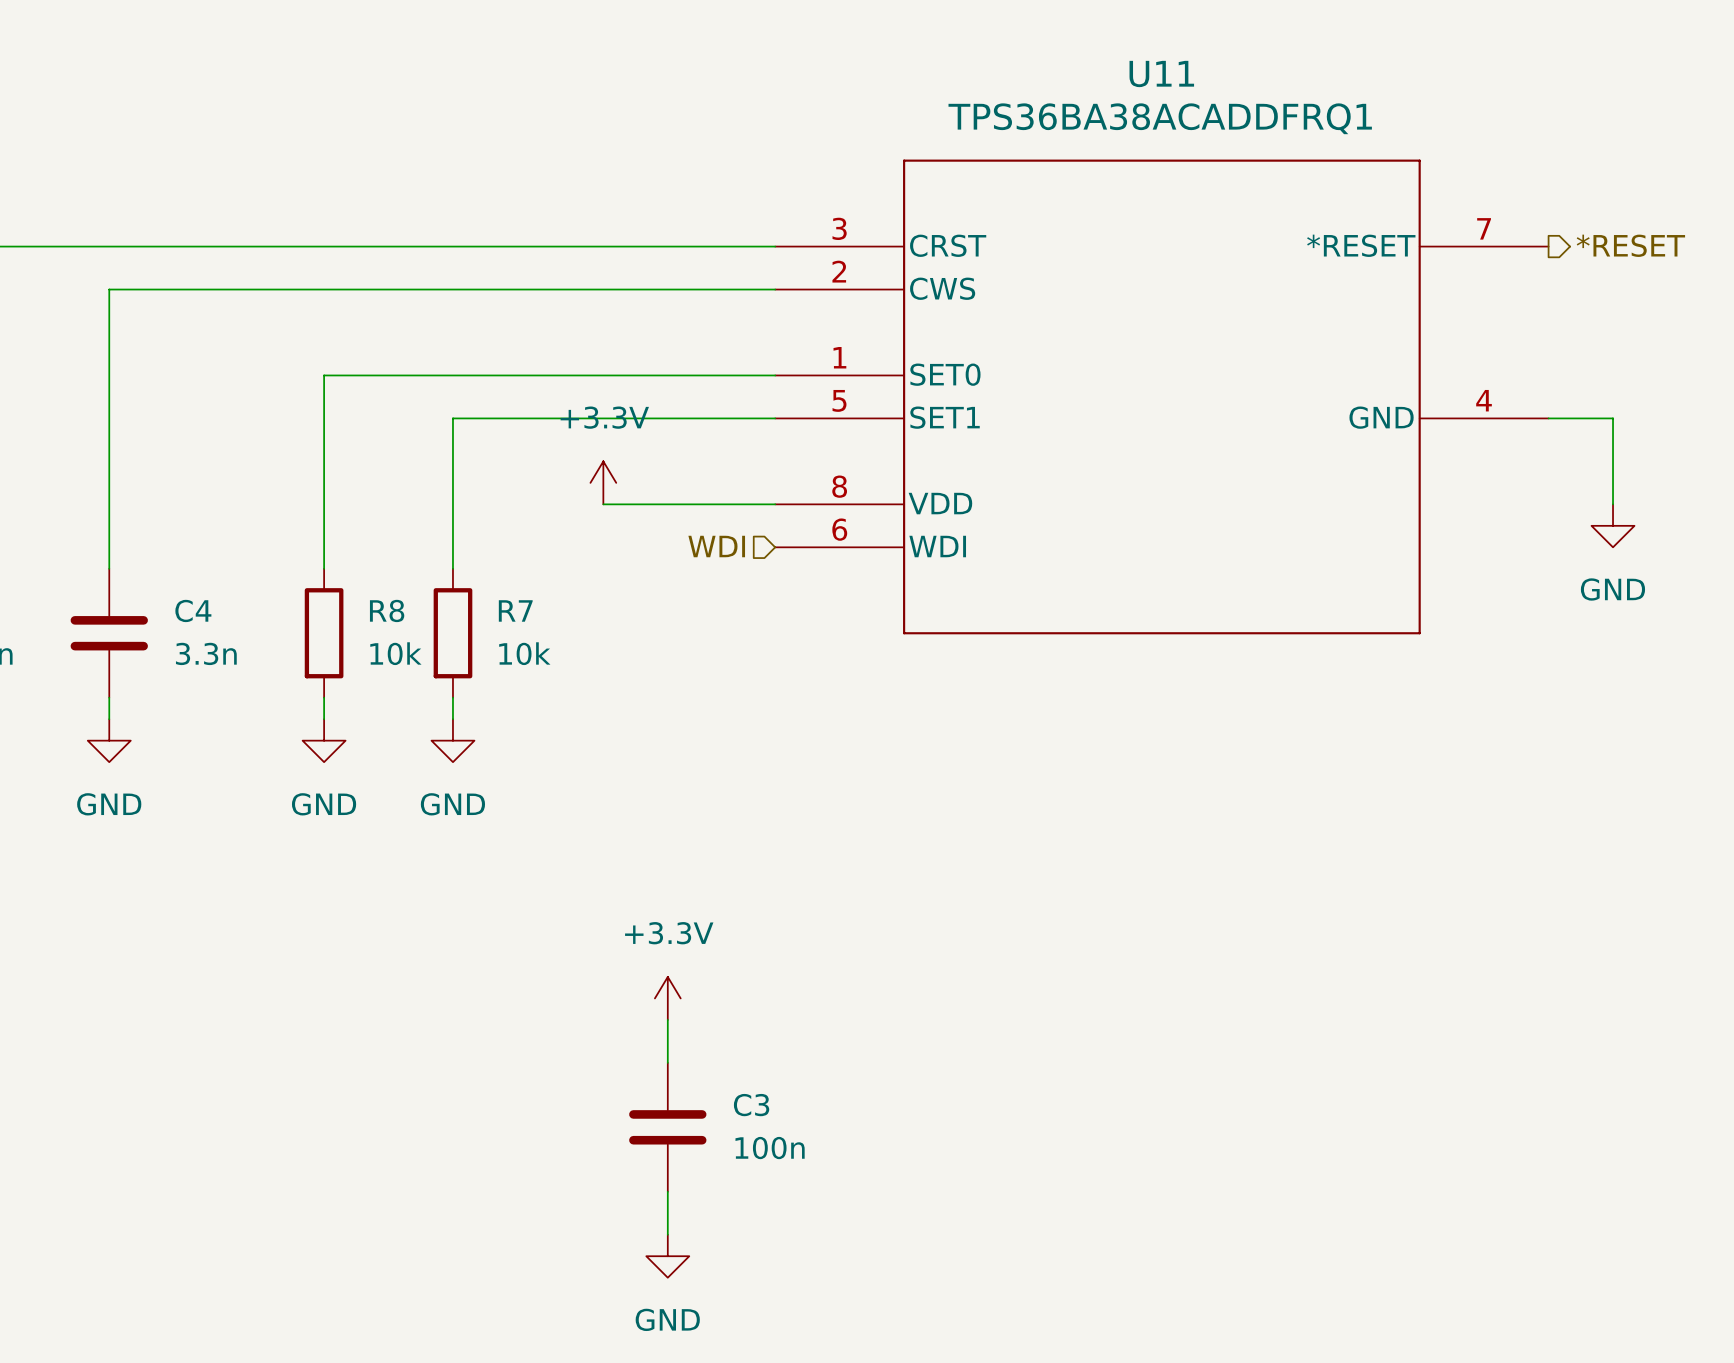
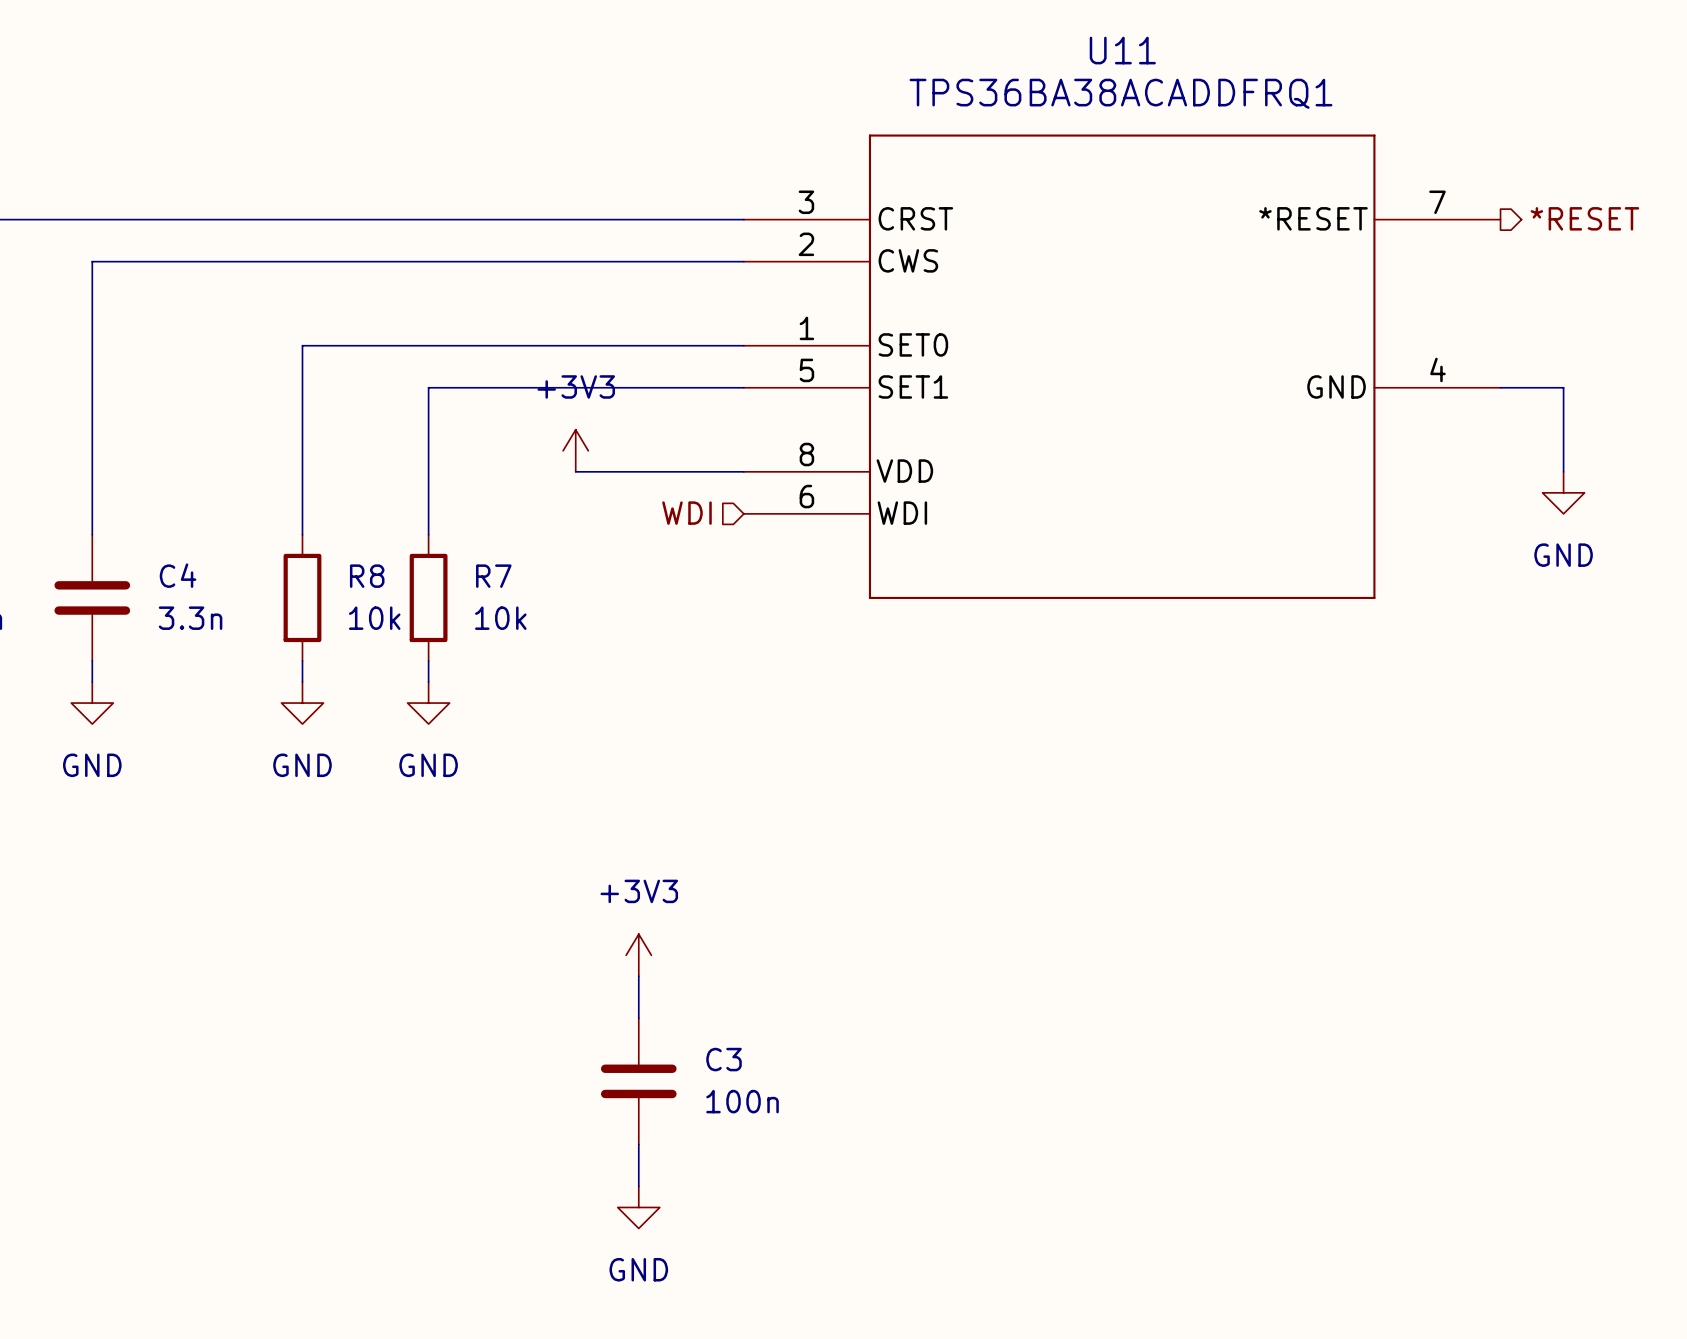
power symbol: +3.3V (603, 482) -> +3V3 (575, 450)
power symbol: +3.3V (667, 998) -> +3V3 (638, 955)

